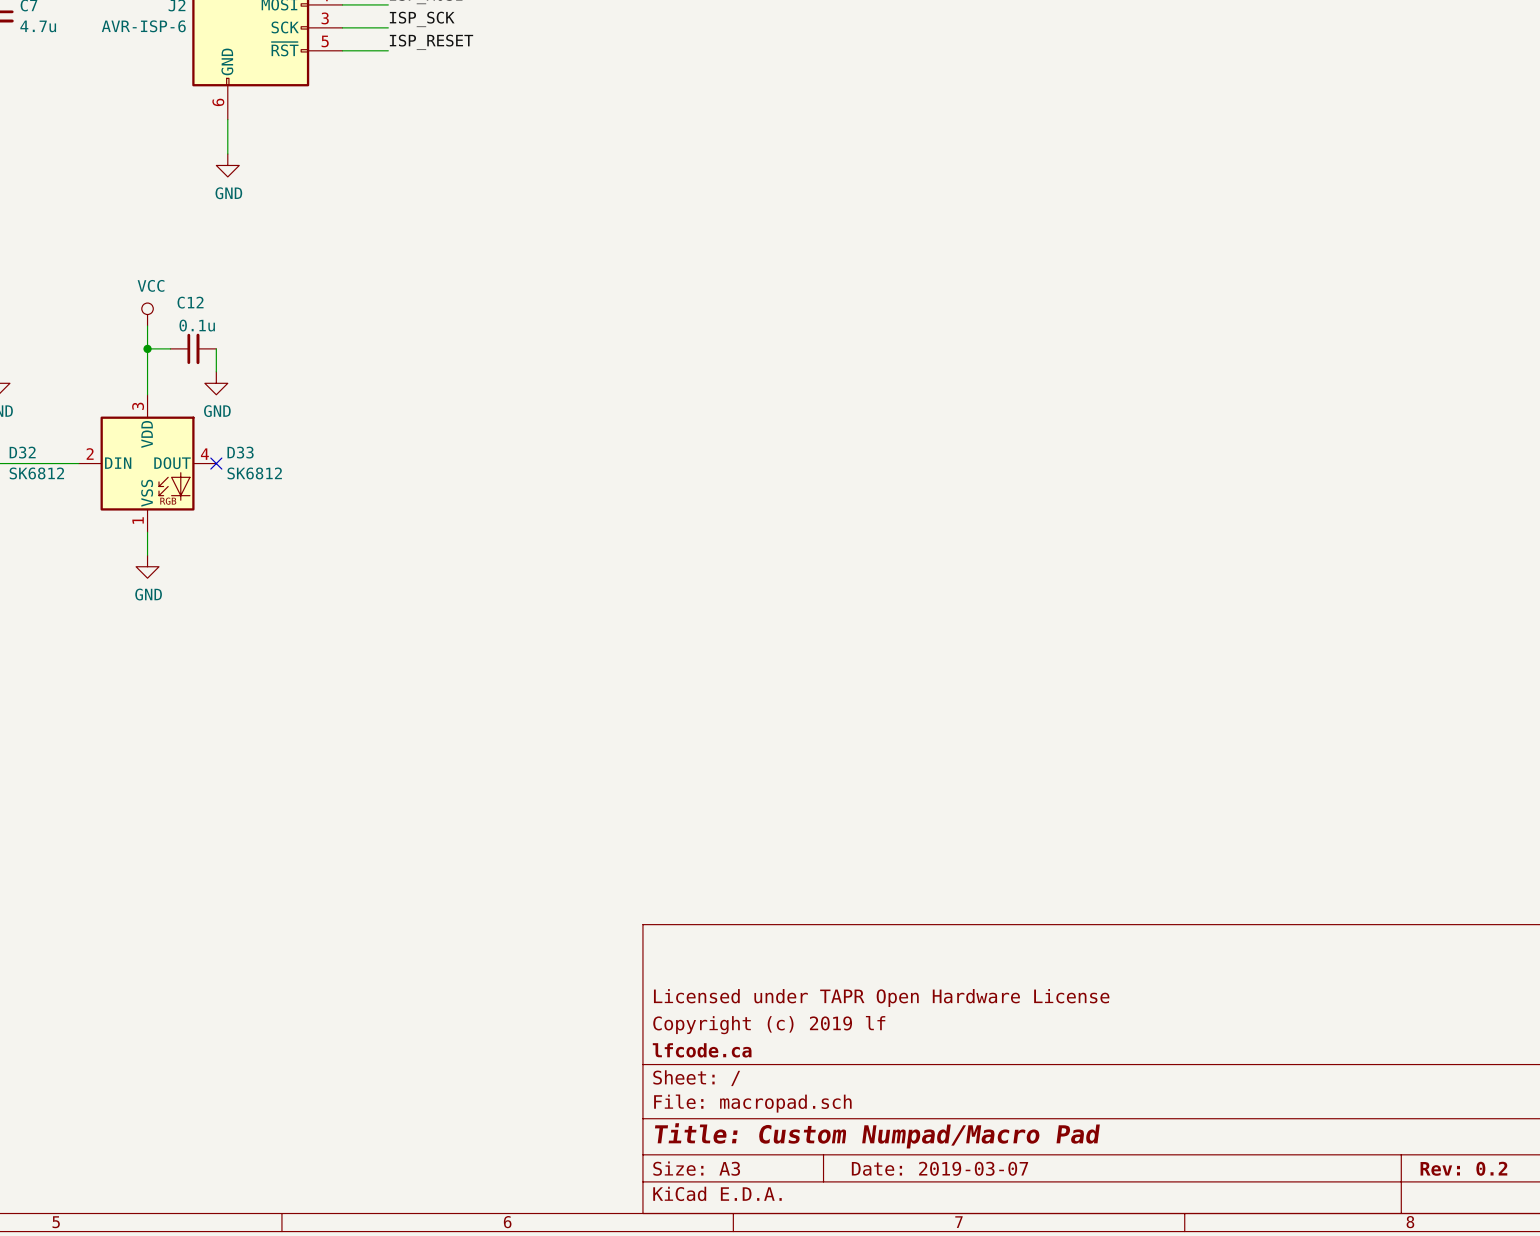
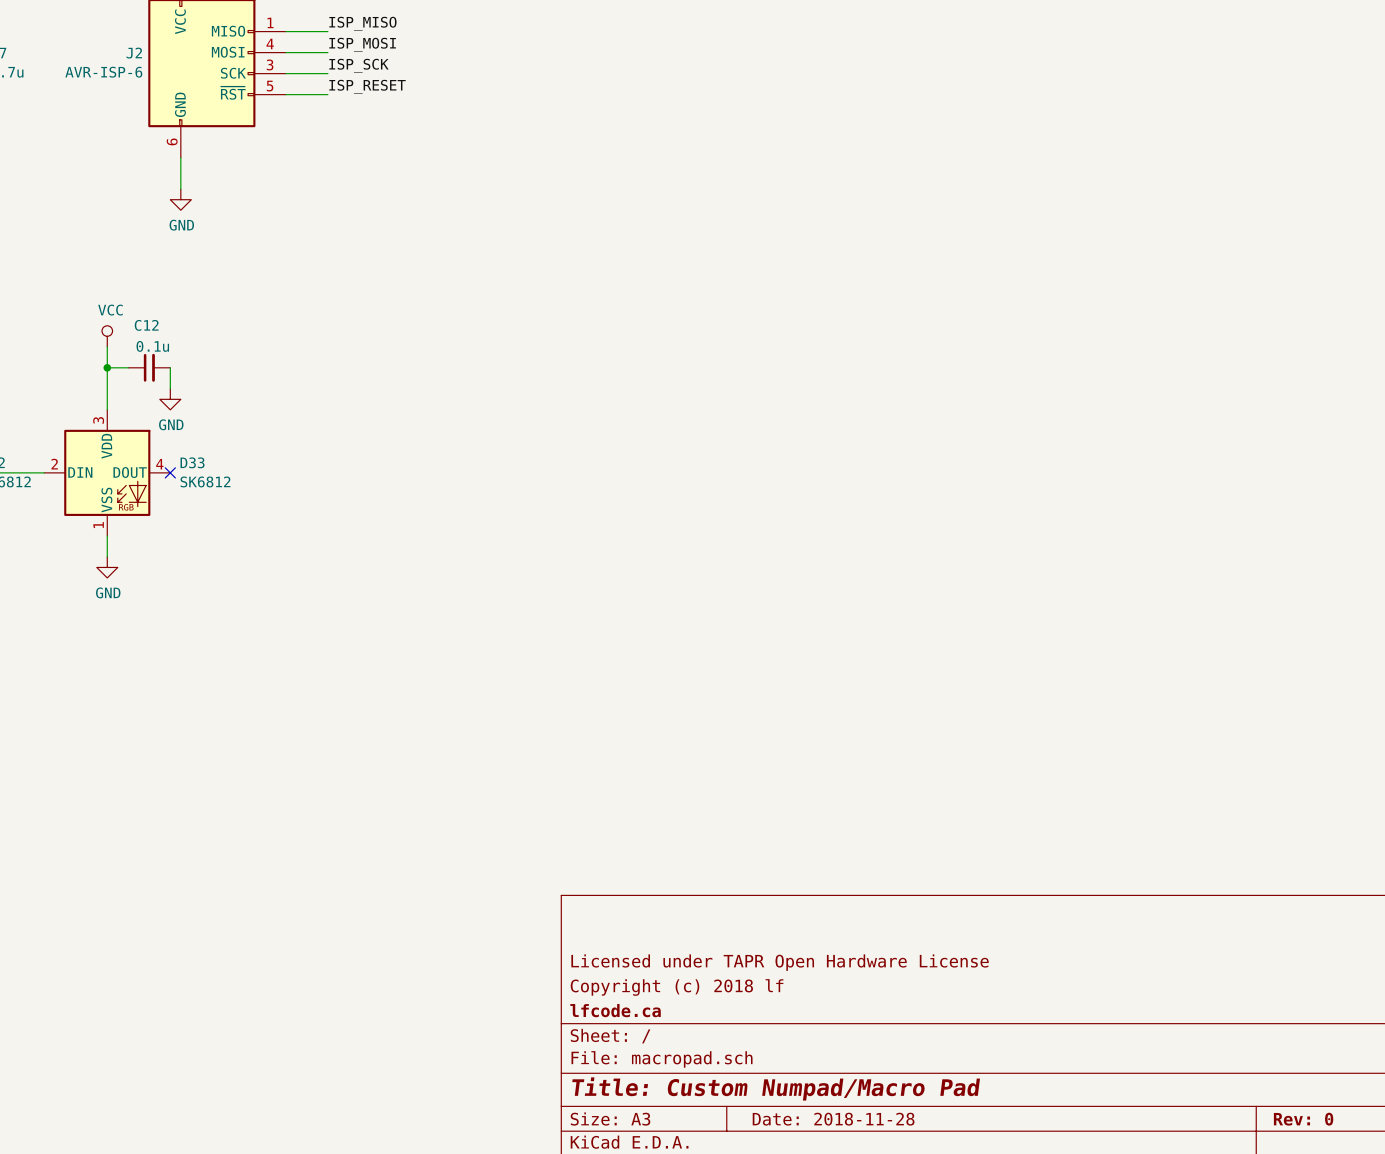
title block: Copyright (c) 2019 lf (769, 1025) -> Copyright (c) 2018 lf (677, 987)
title block: Date: 2019-03-07 (939, 1168) -> Date: 2018-11-28 (833, 1119)
title block: Rev: 0.2 (1463, 1168) -> Rev: 0 (1303, 1119)

